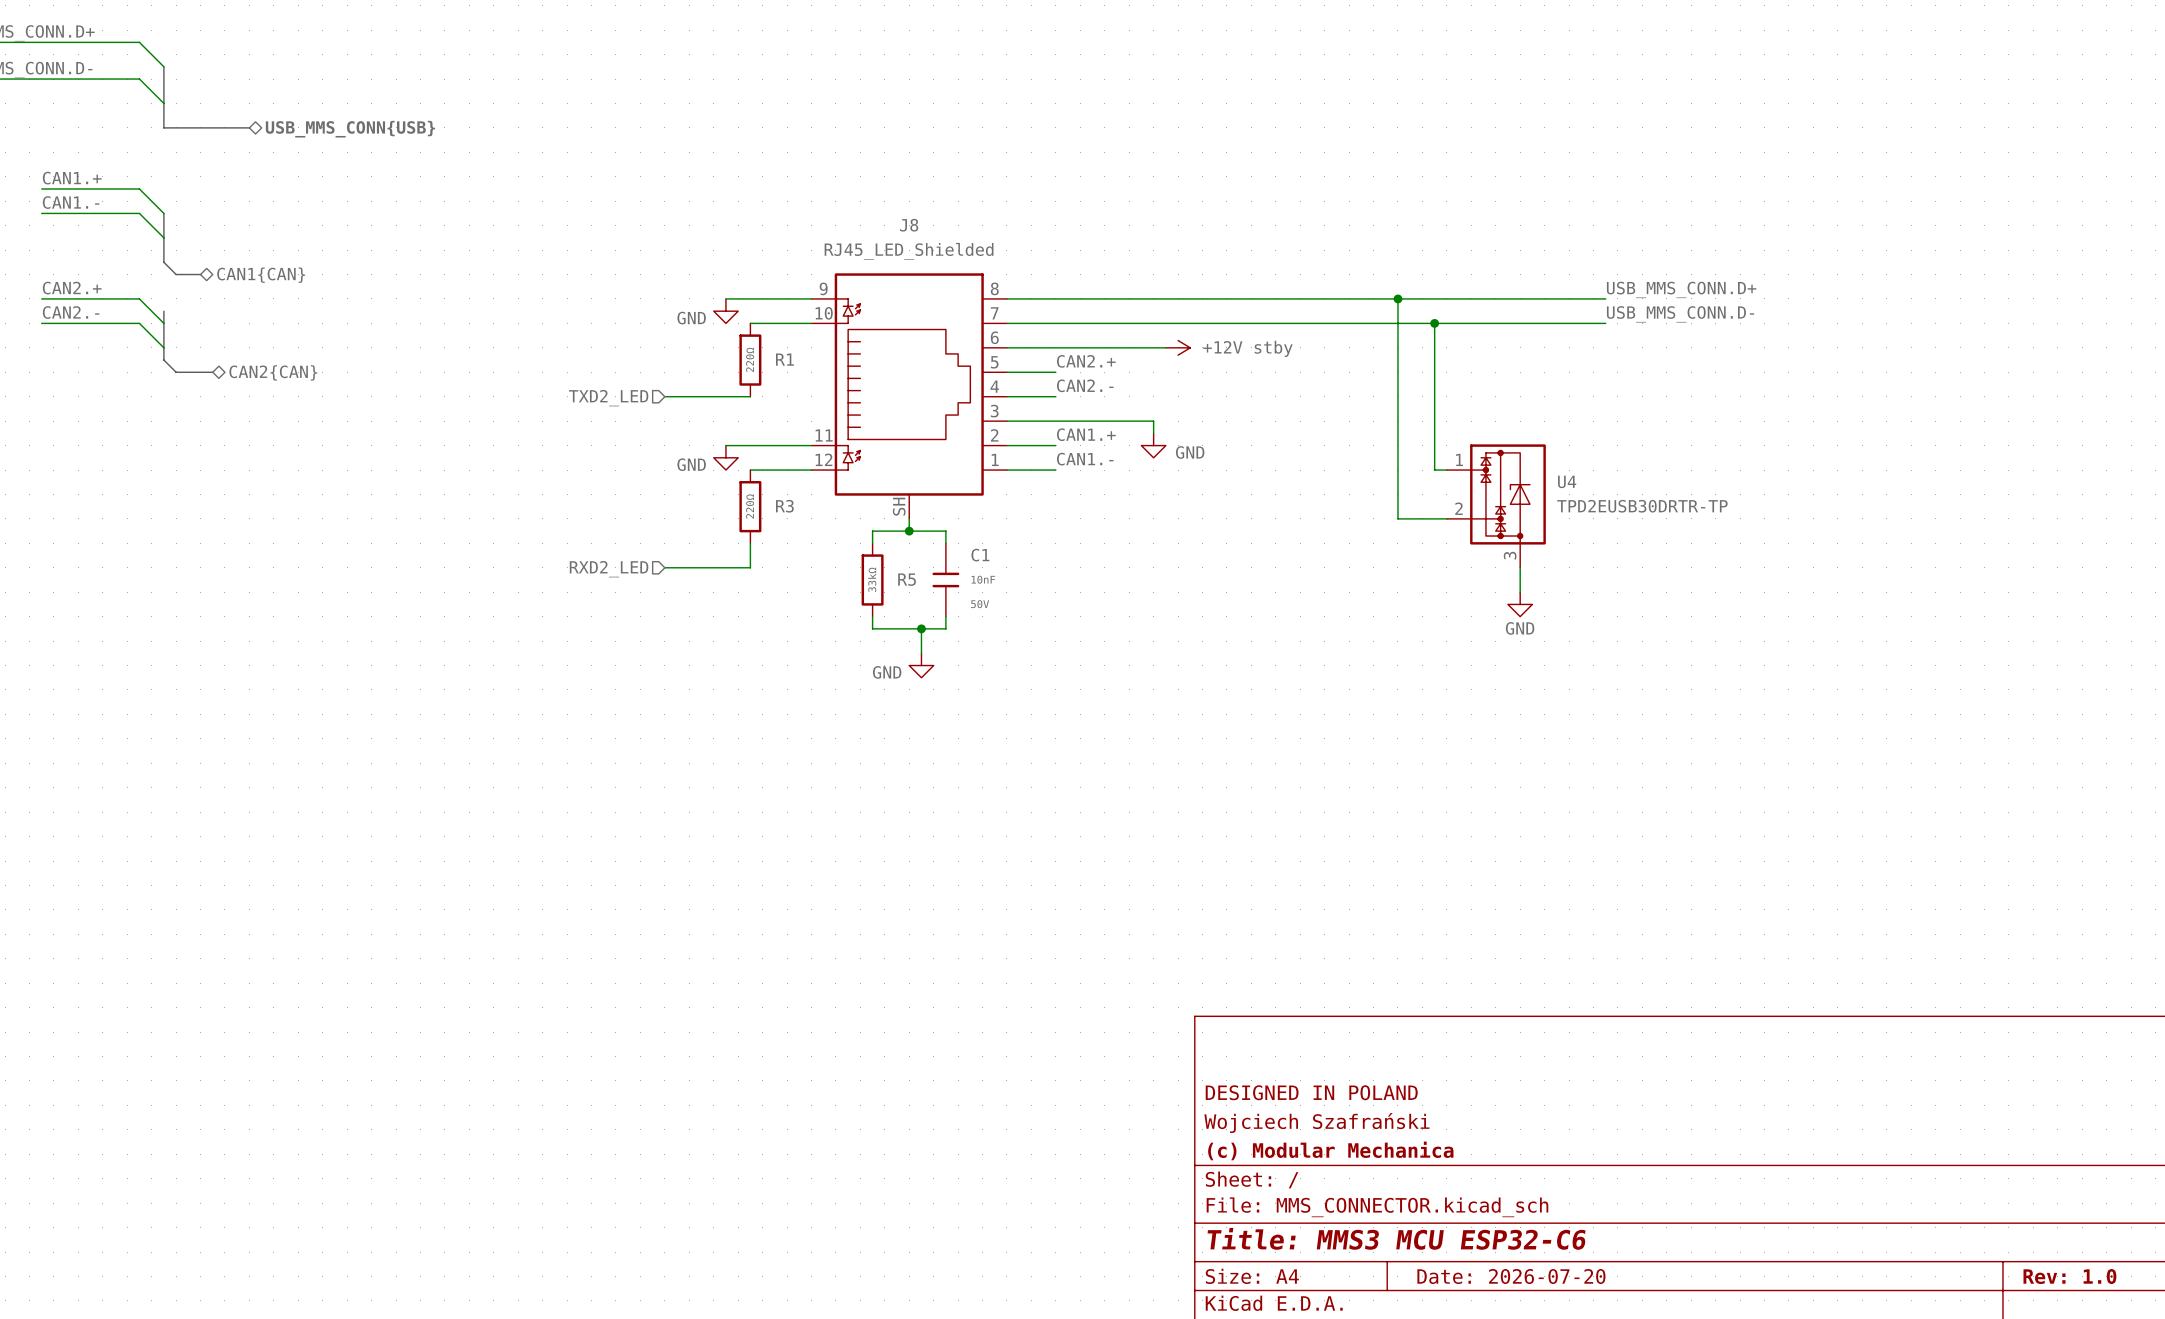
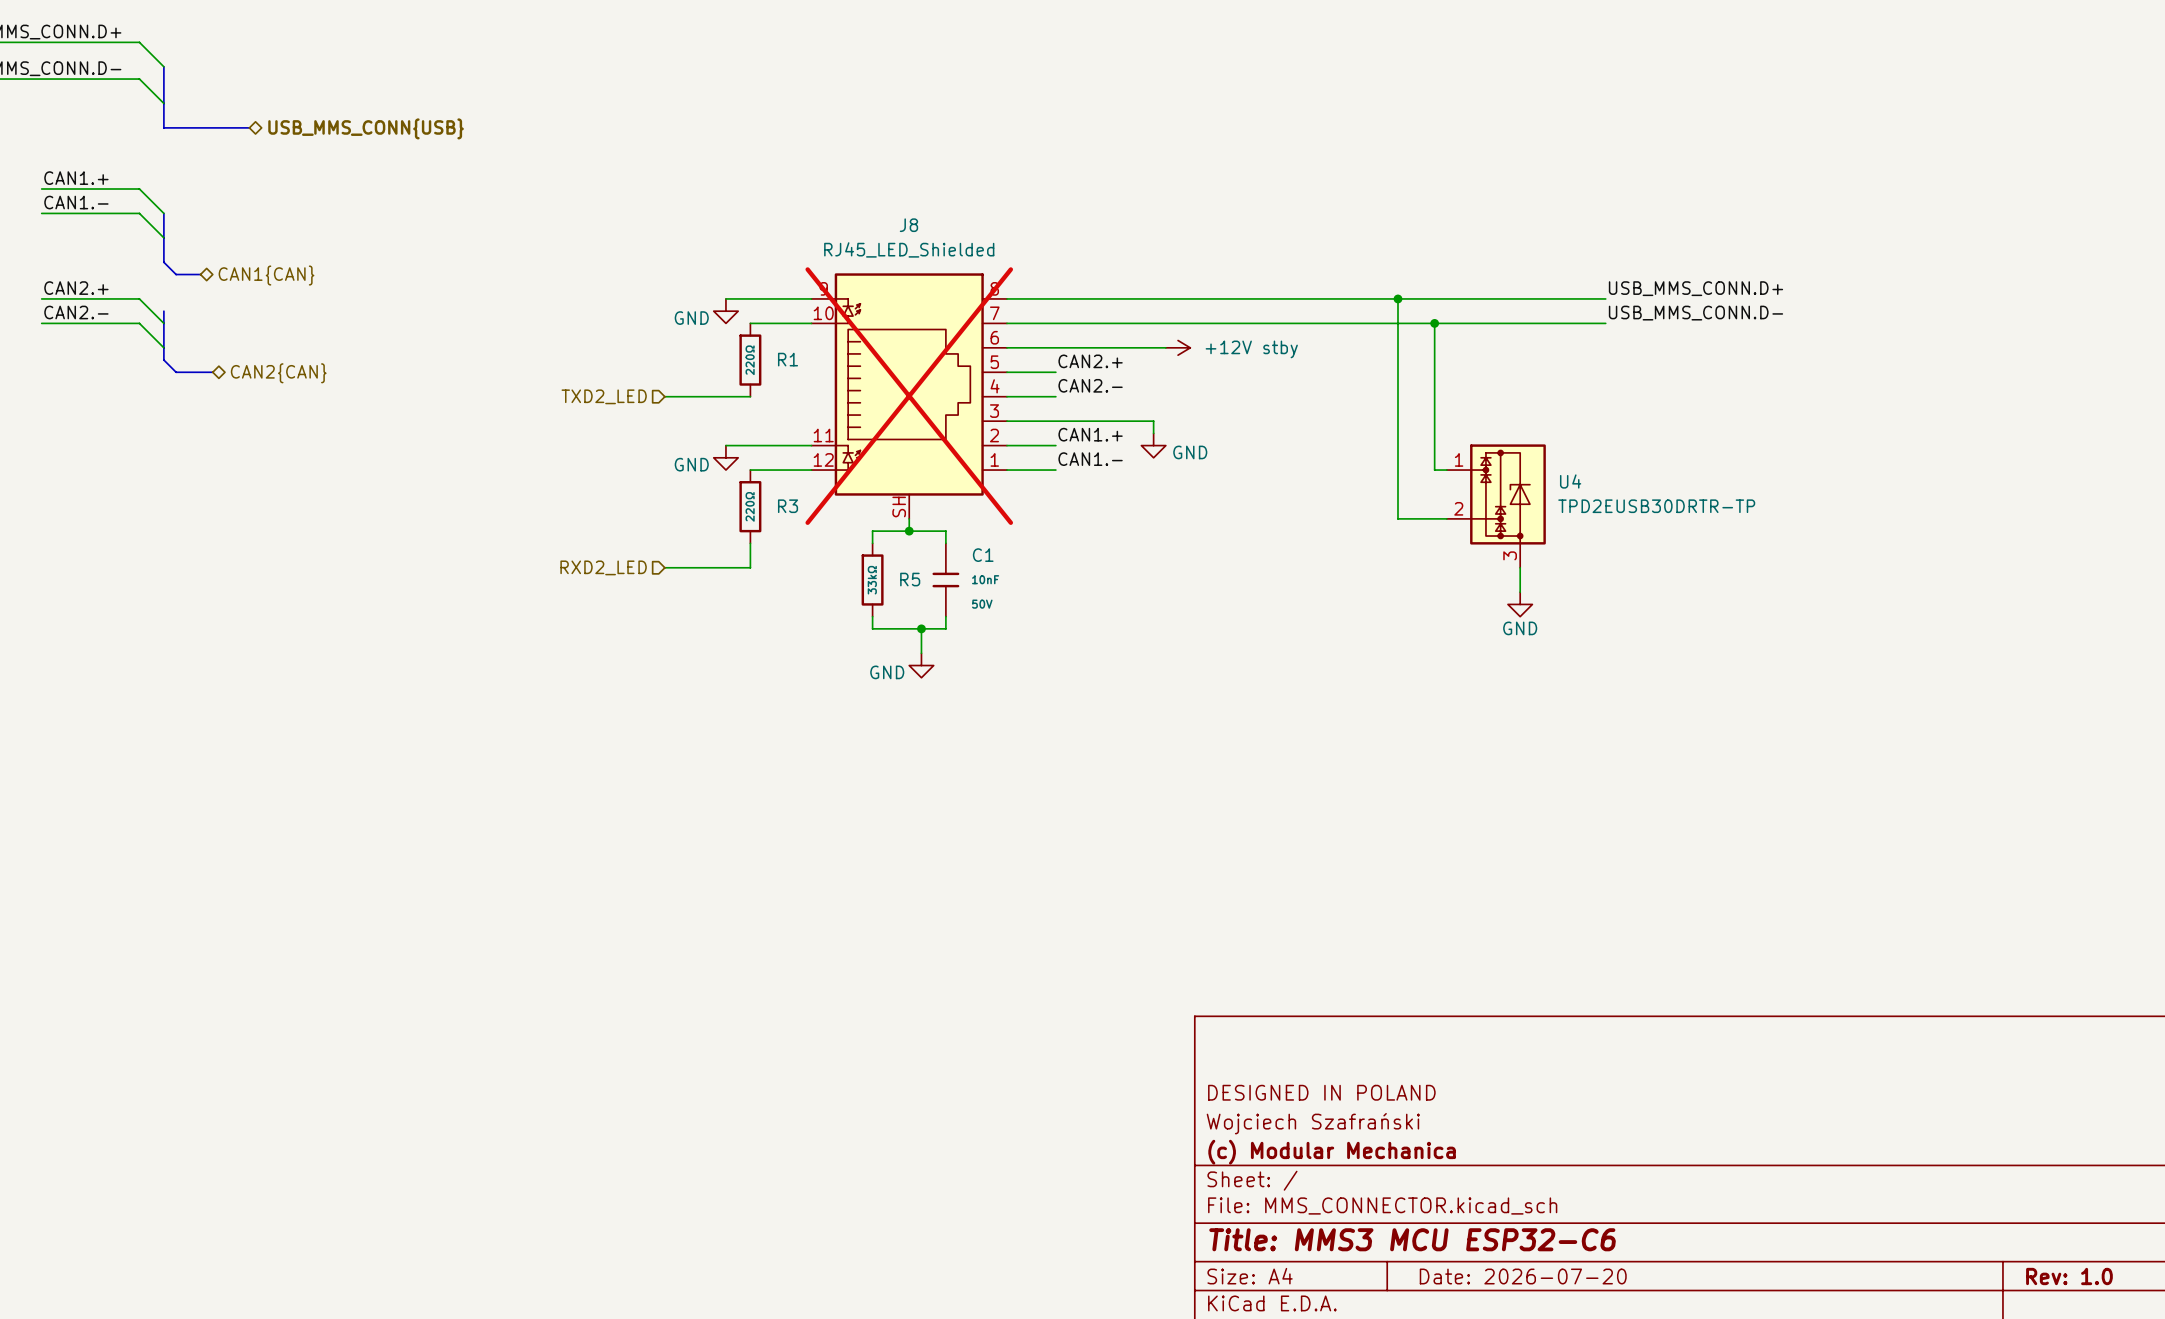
J8 do-not-place cross: none -> (909, 396)

